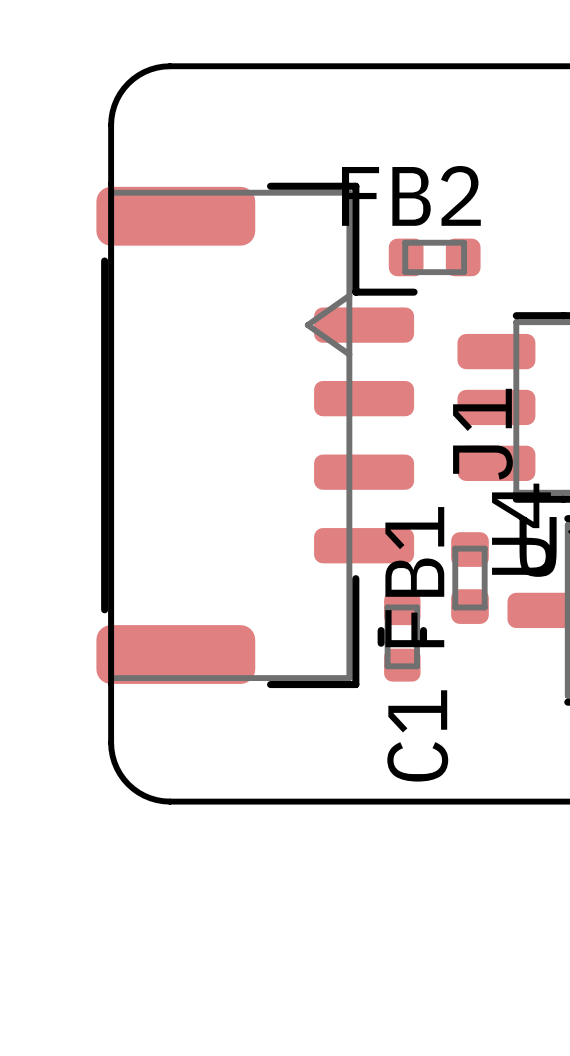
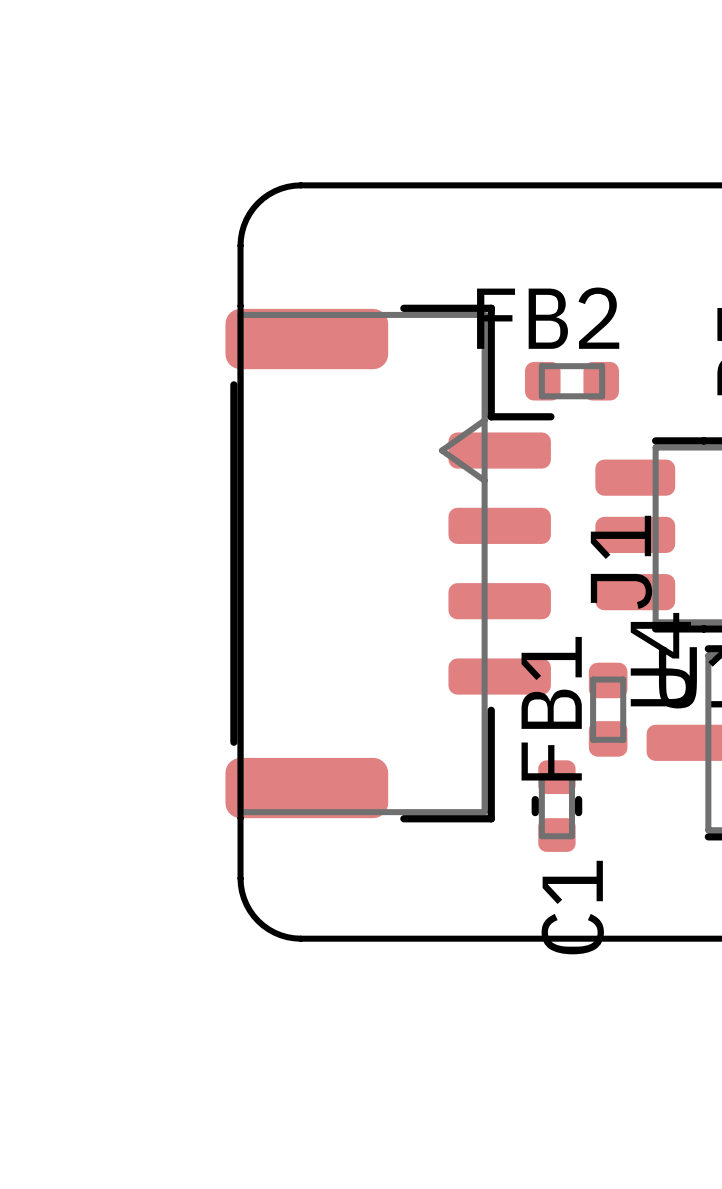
C1 position: (402, 636) -> (556, 806)

